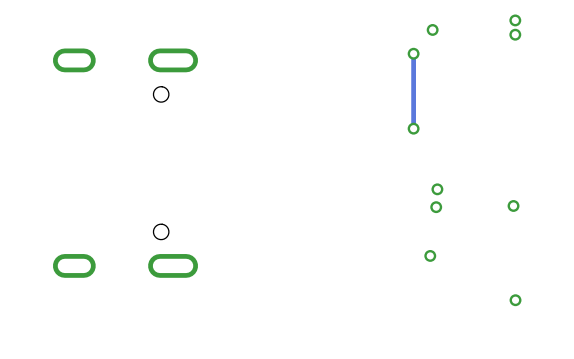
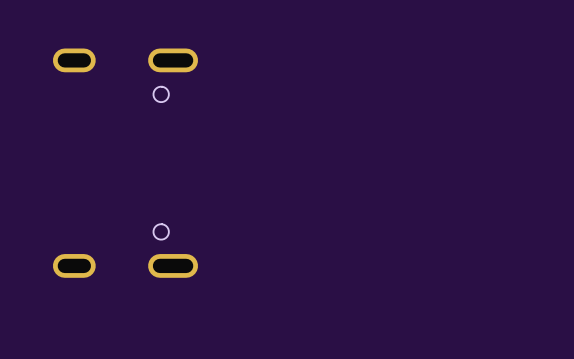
via: (515, 20) -> none
via: (432, 29) -> none
via: (515, 34) -> none
track: (413, 53) (413, 128) -> none
via: (413, 53) -> none
via: (413, 128) -> none
via: (437, 189) -> none
via: (513, 205) -> none
via: (436, 207) -> none
via: (430, 255) -> none
via: (515, 300) -> none

